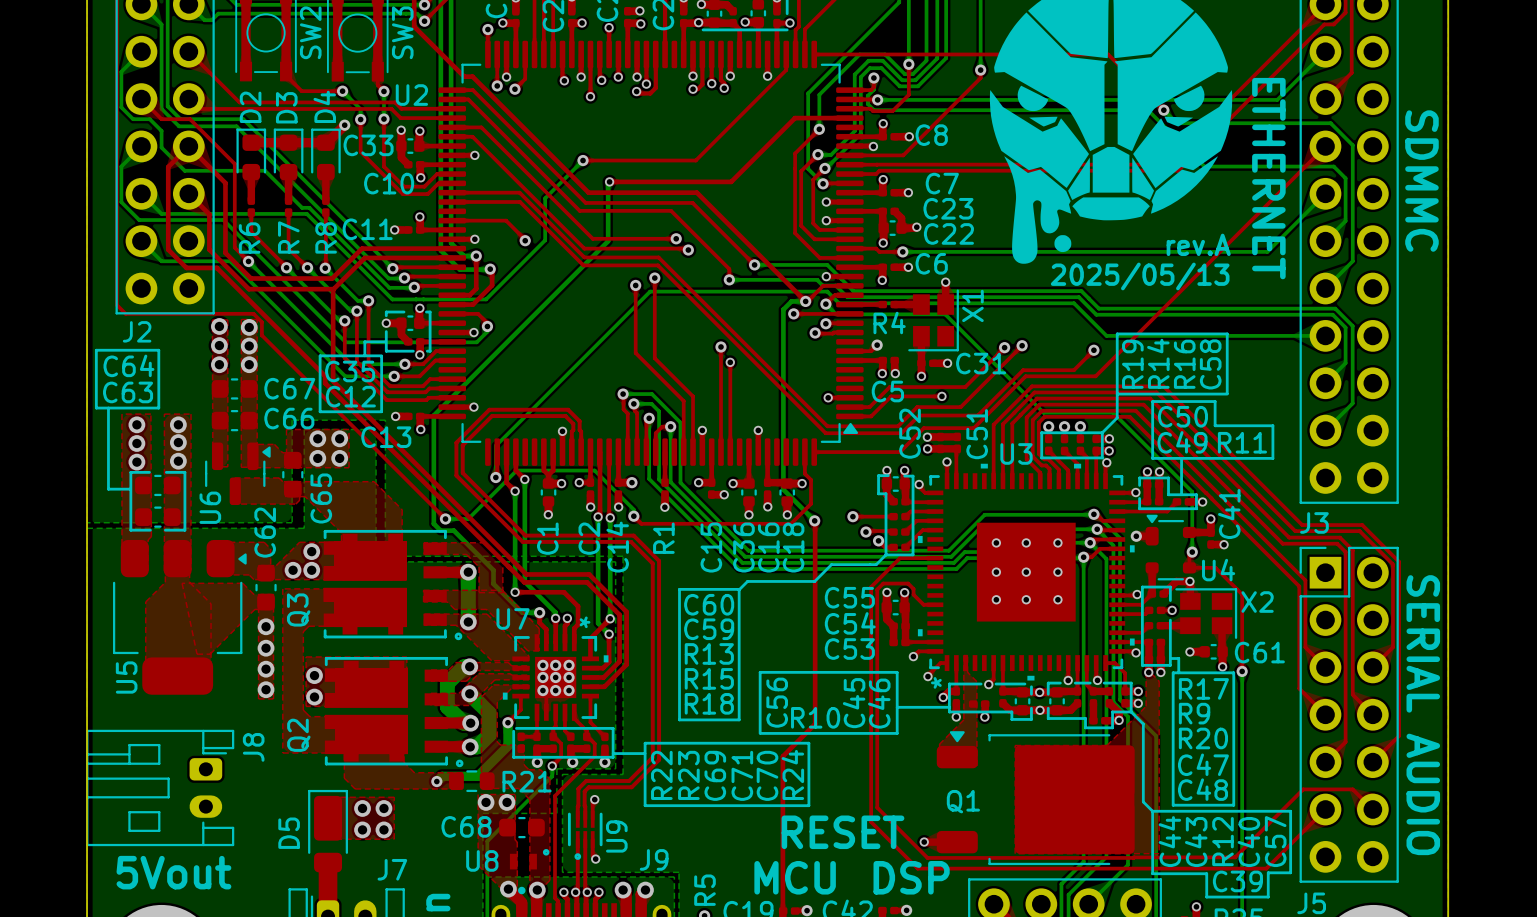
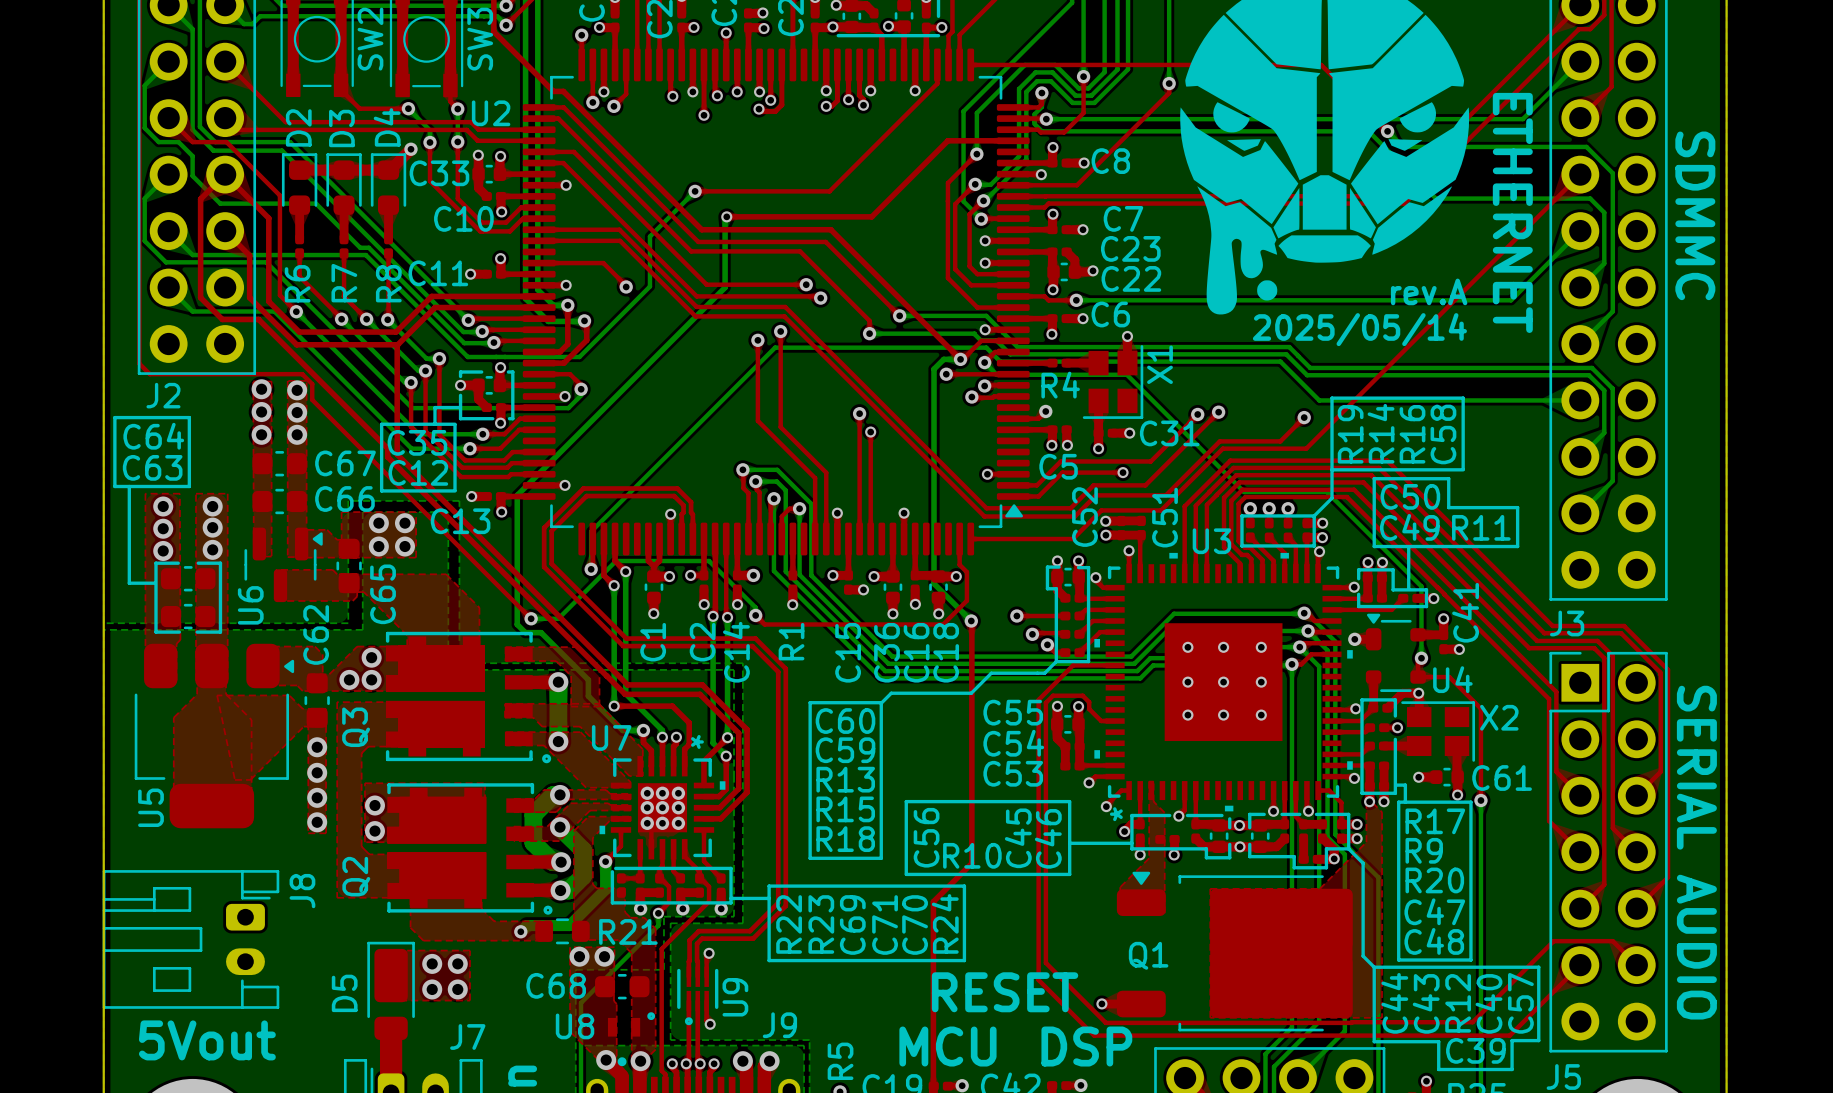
text: 2025/05/13 (1140, 276) -> 2025/05/14 (1359, 329)

